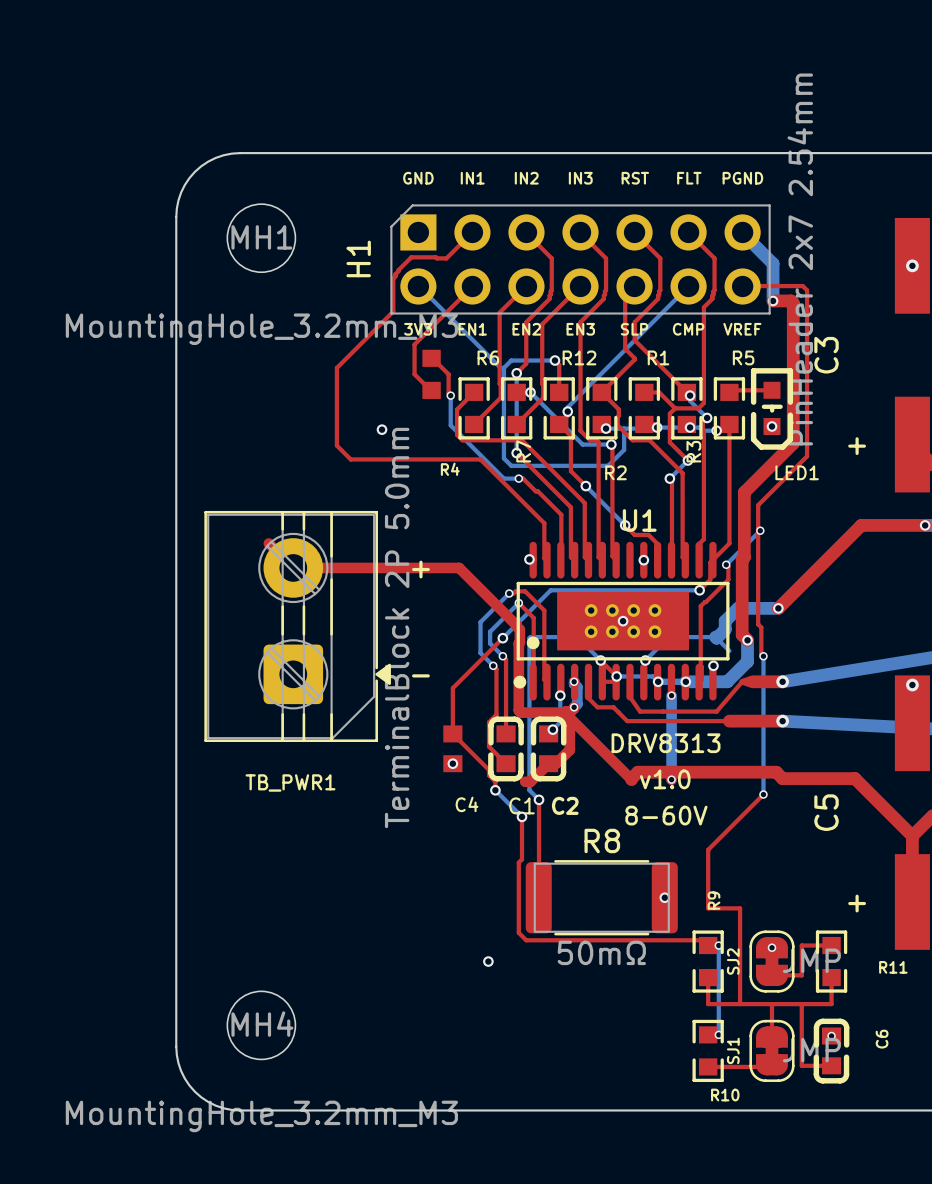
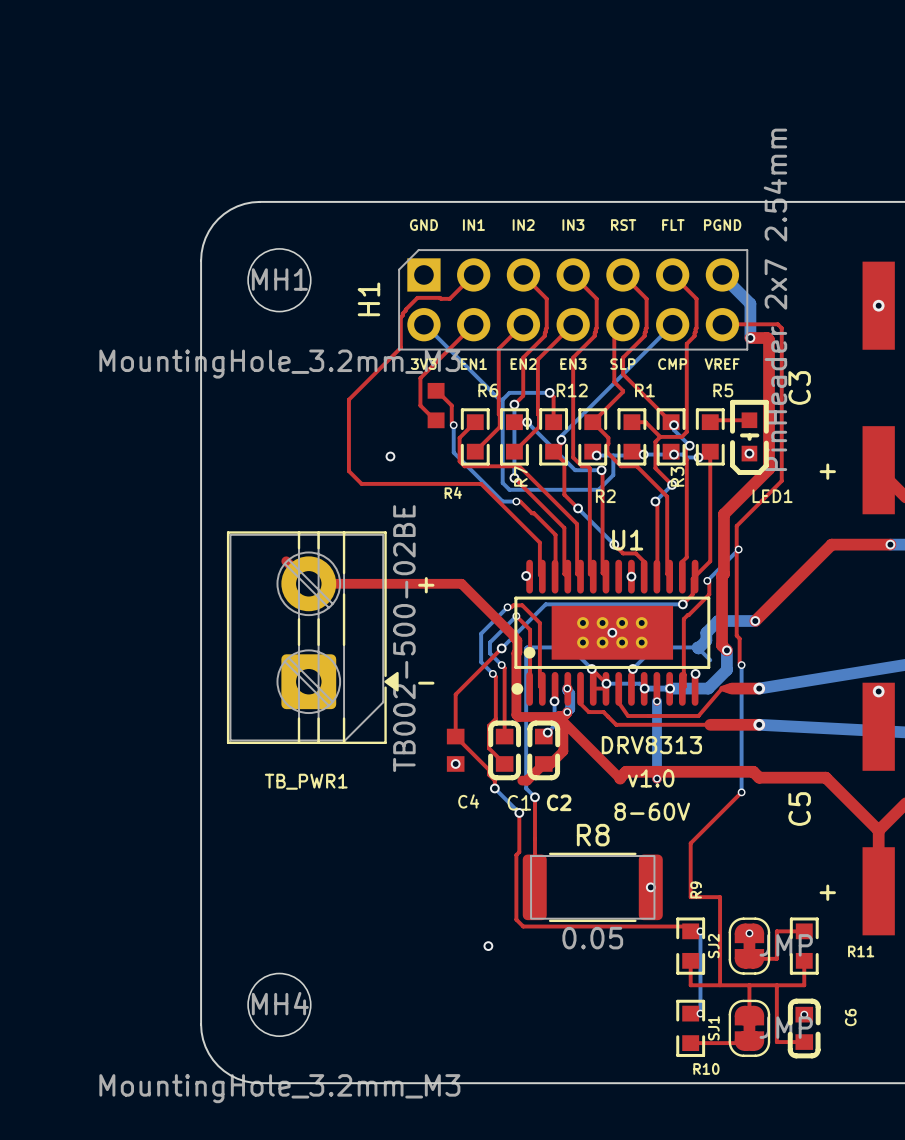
TB_PWR1 value: TerminalBlock 2P 5.0mm (397, 627) -> TB002-500-02BE (404, 638)
R8 value: 50mΩ (601, 952) -> 0.05 (592, 938)

